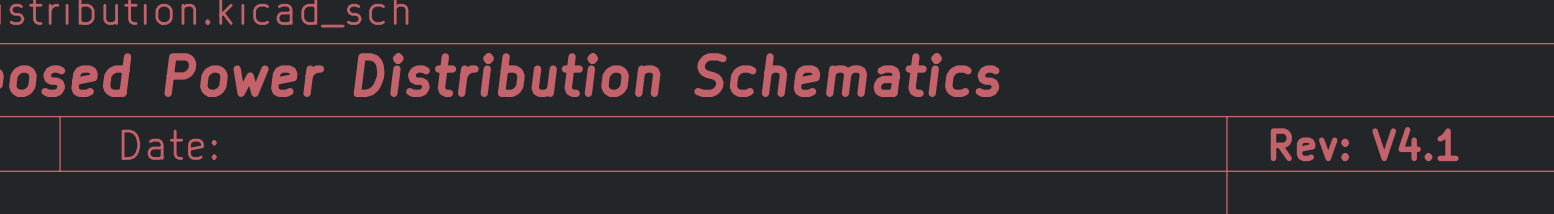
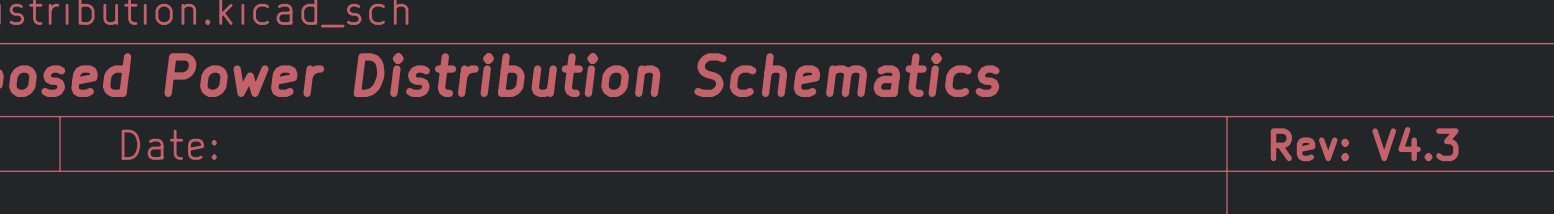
title block: Rev: V4.1 (1364, 144) -> Rev: V4.3 (1364, 144)

